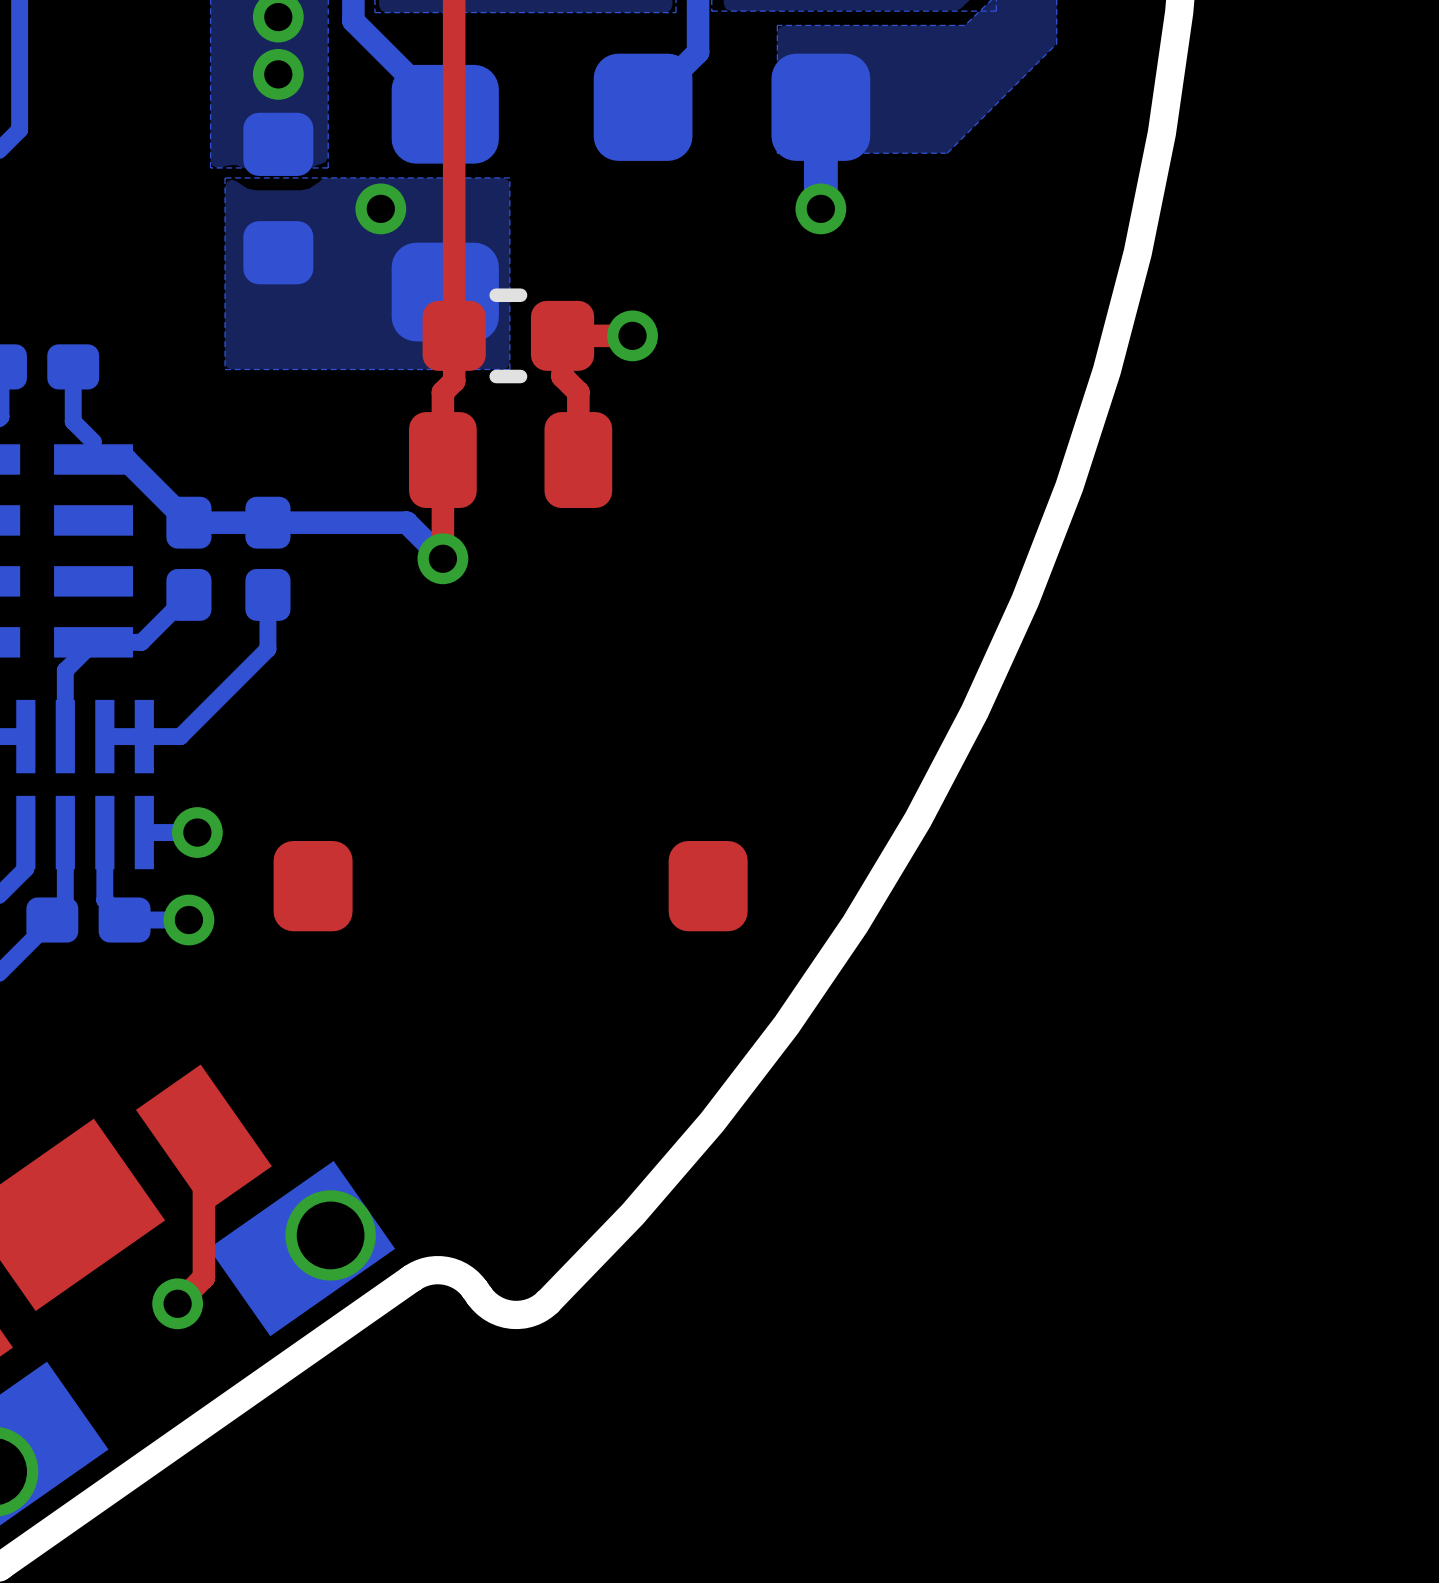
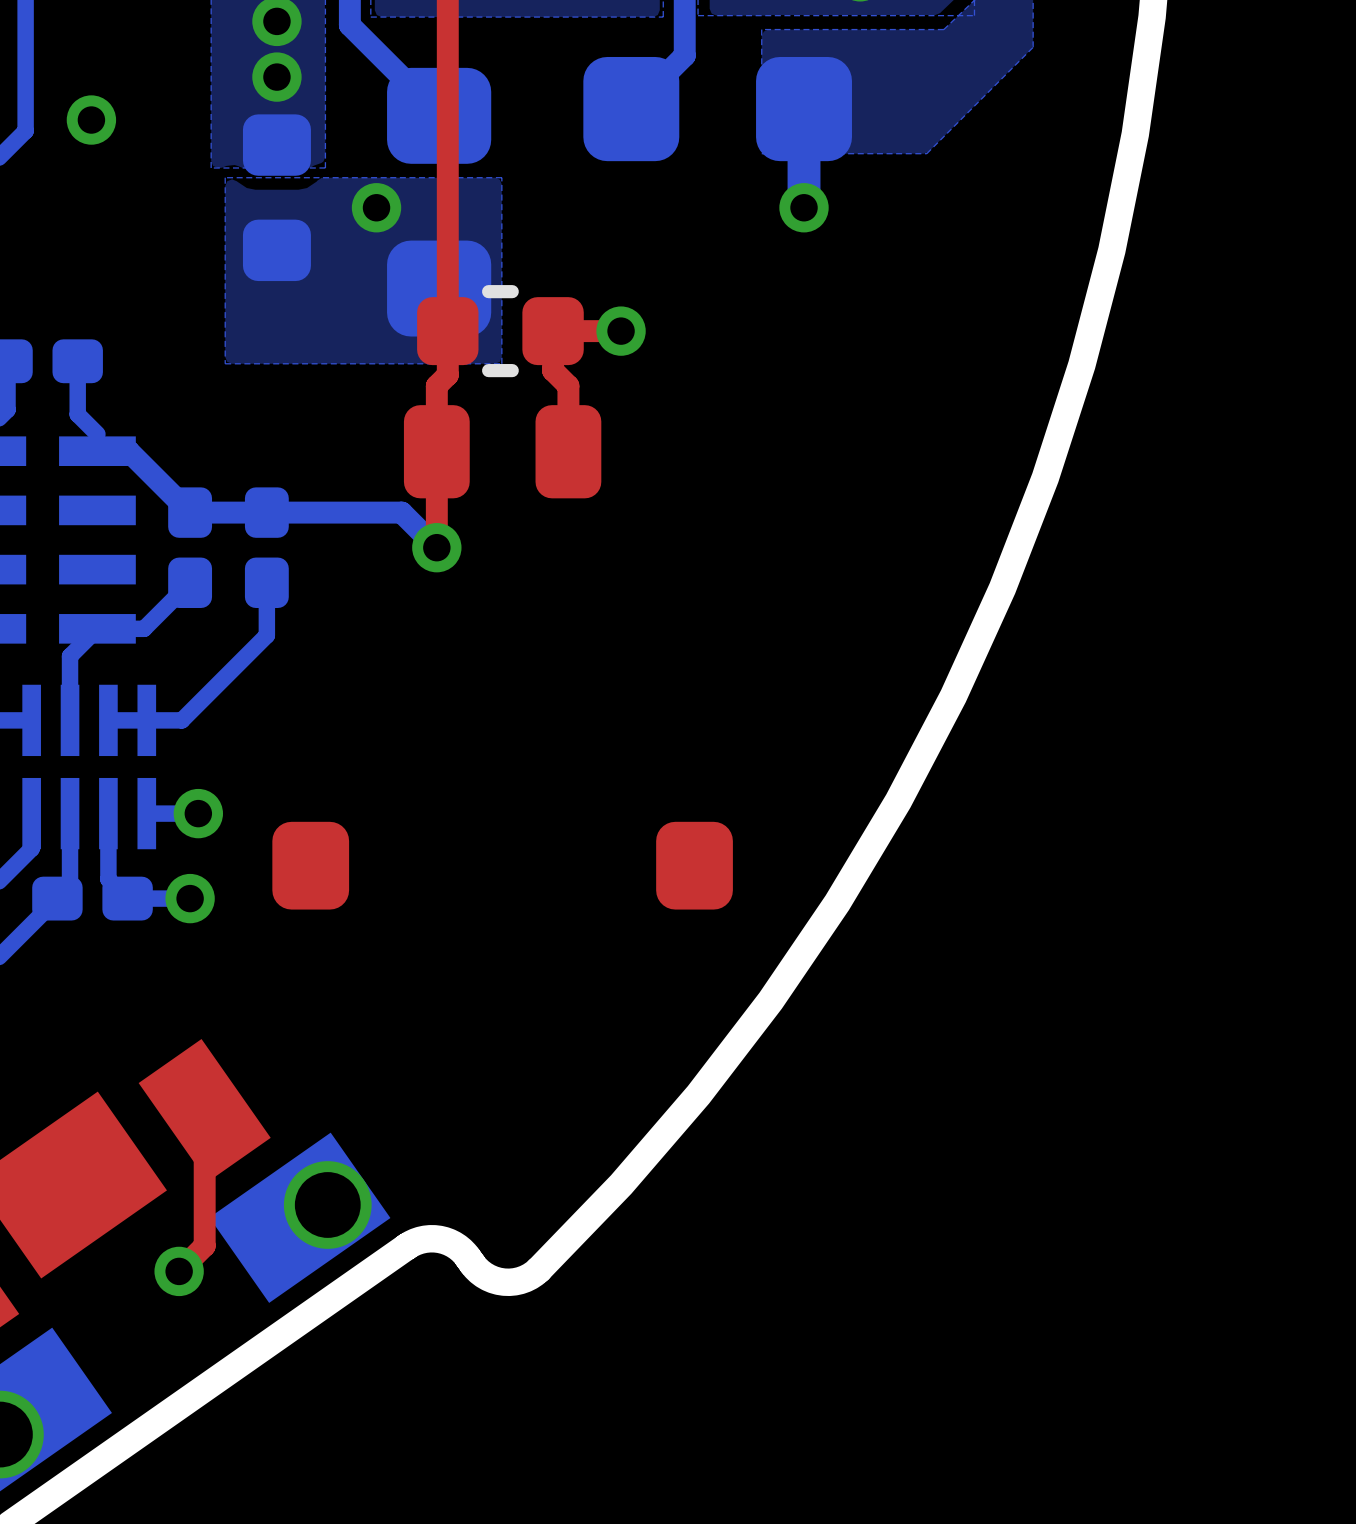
via: none -> (91, 120)

